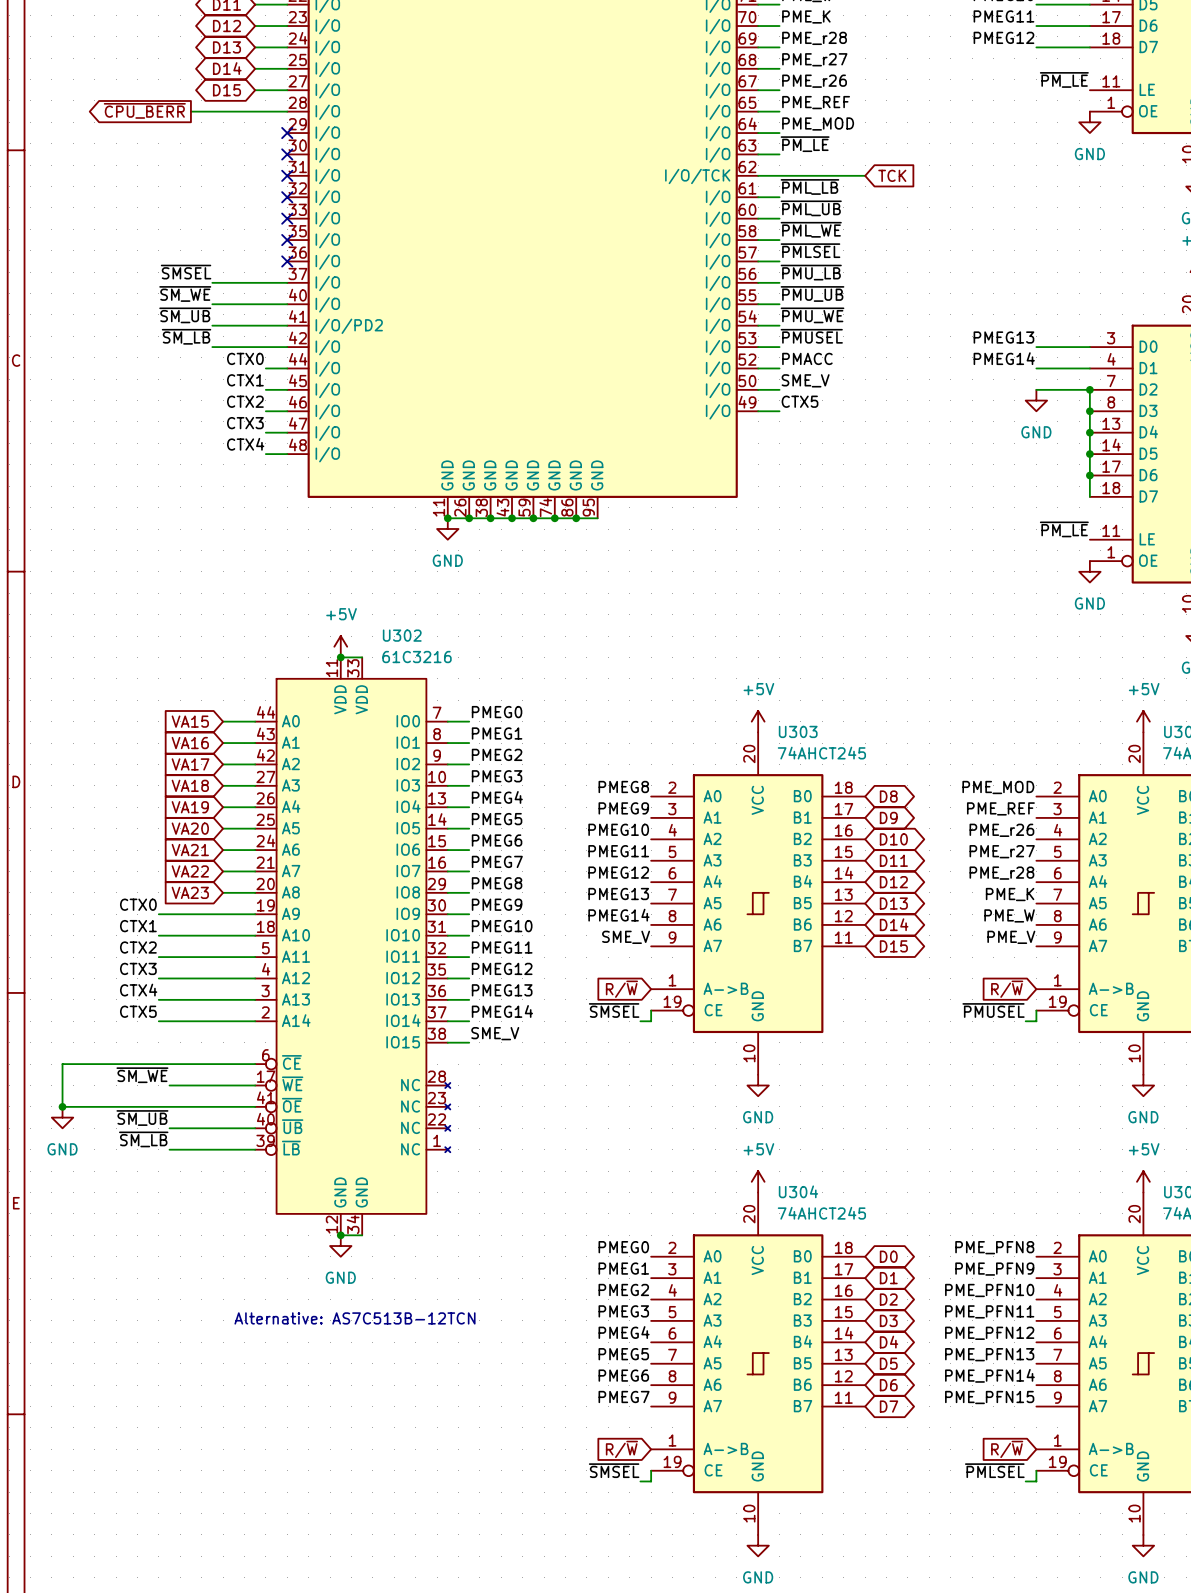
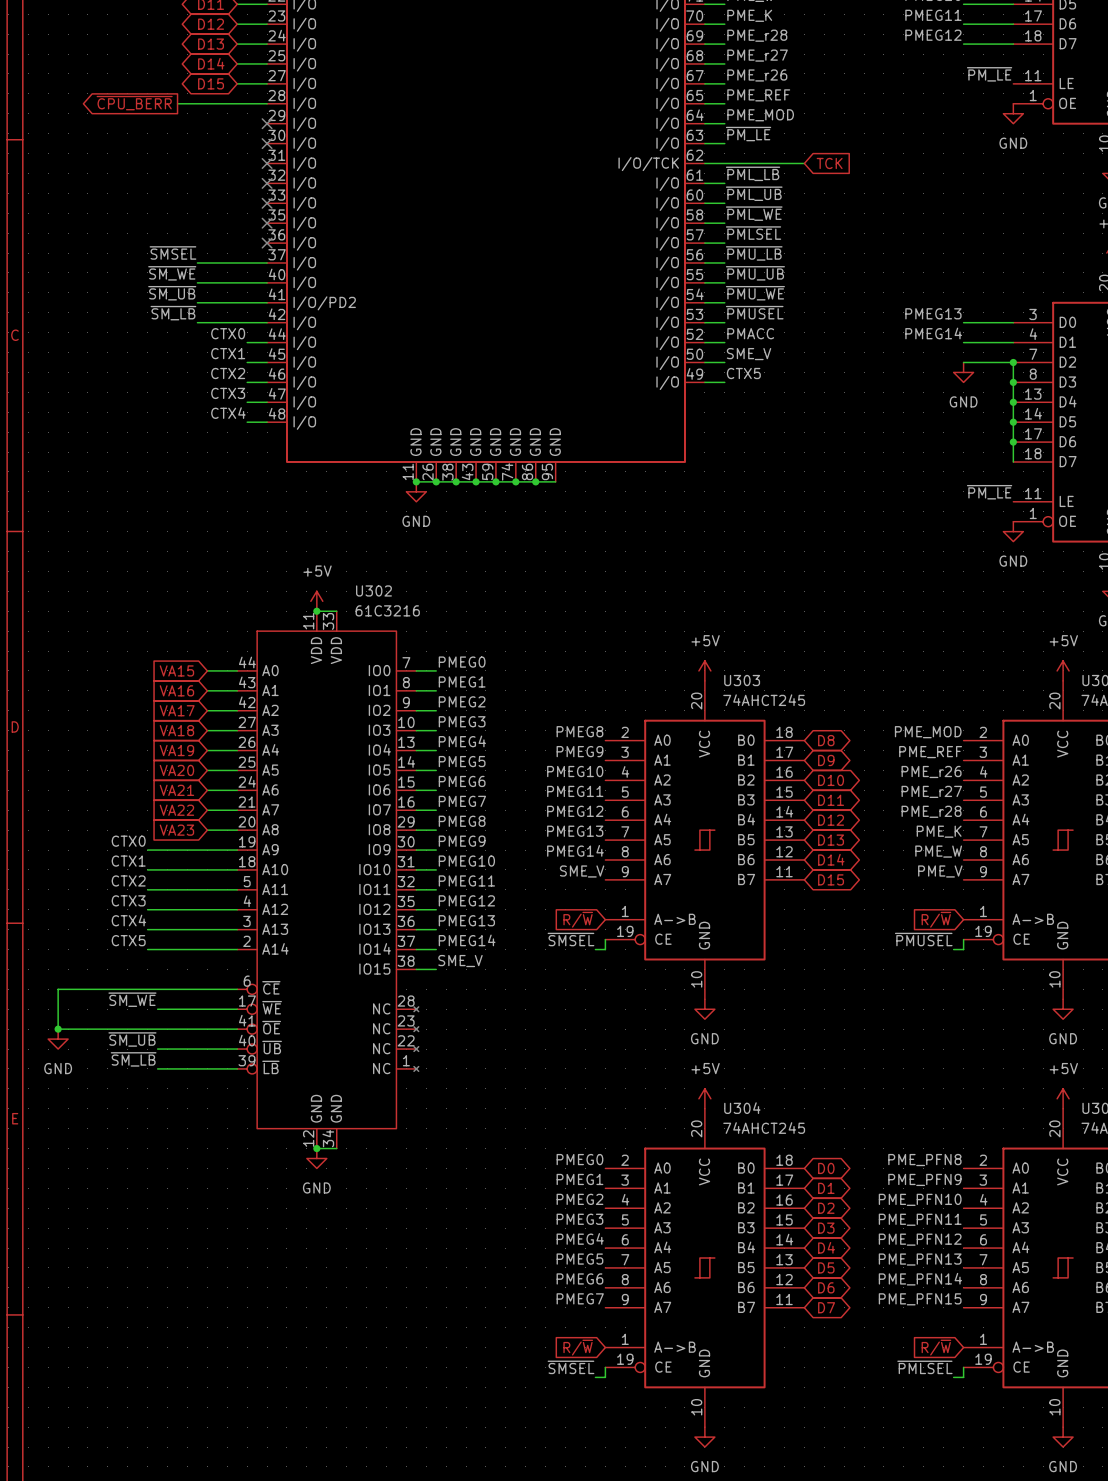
text: Alternative: AS7C513B-12TCN (354, 1318) -> none

